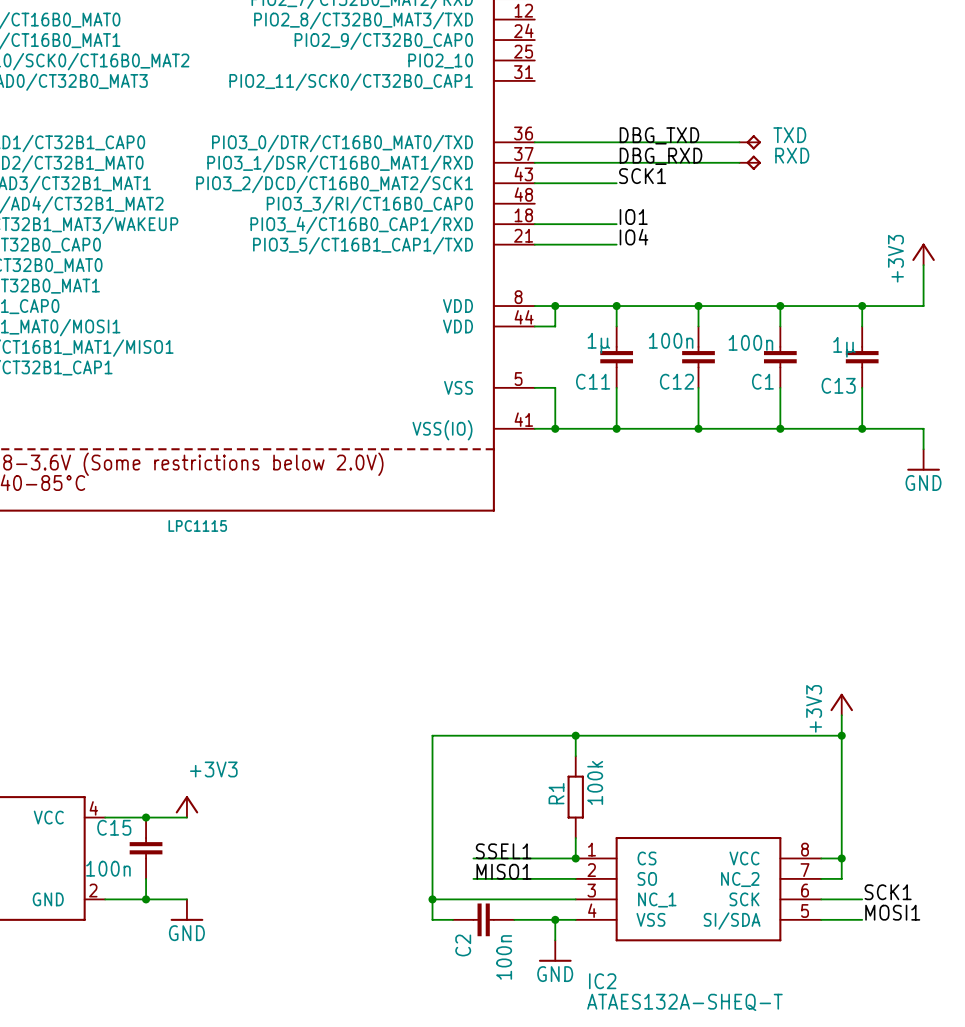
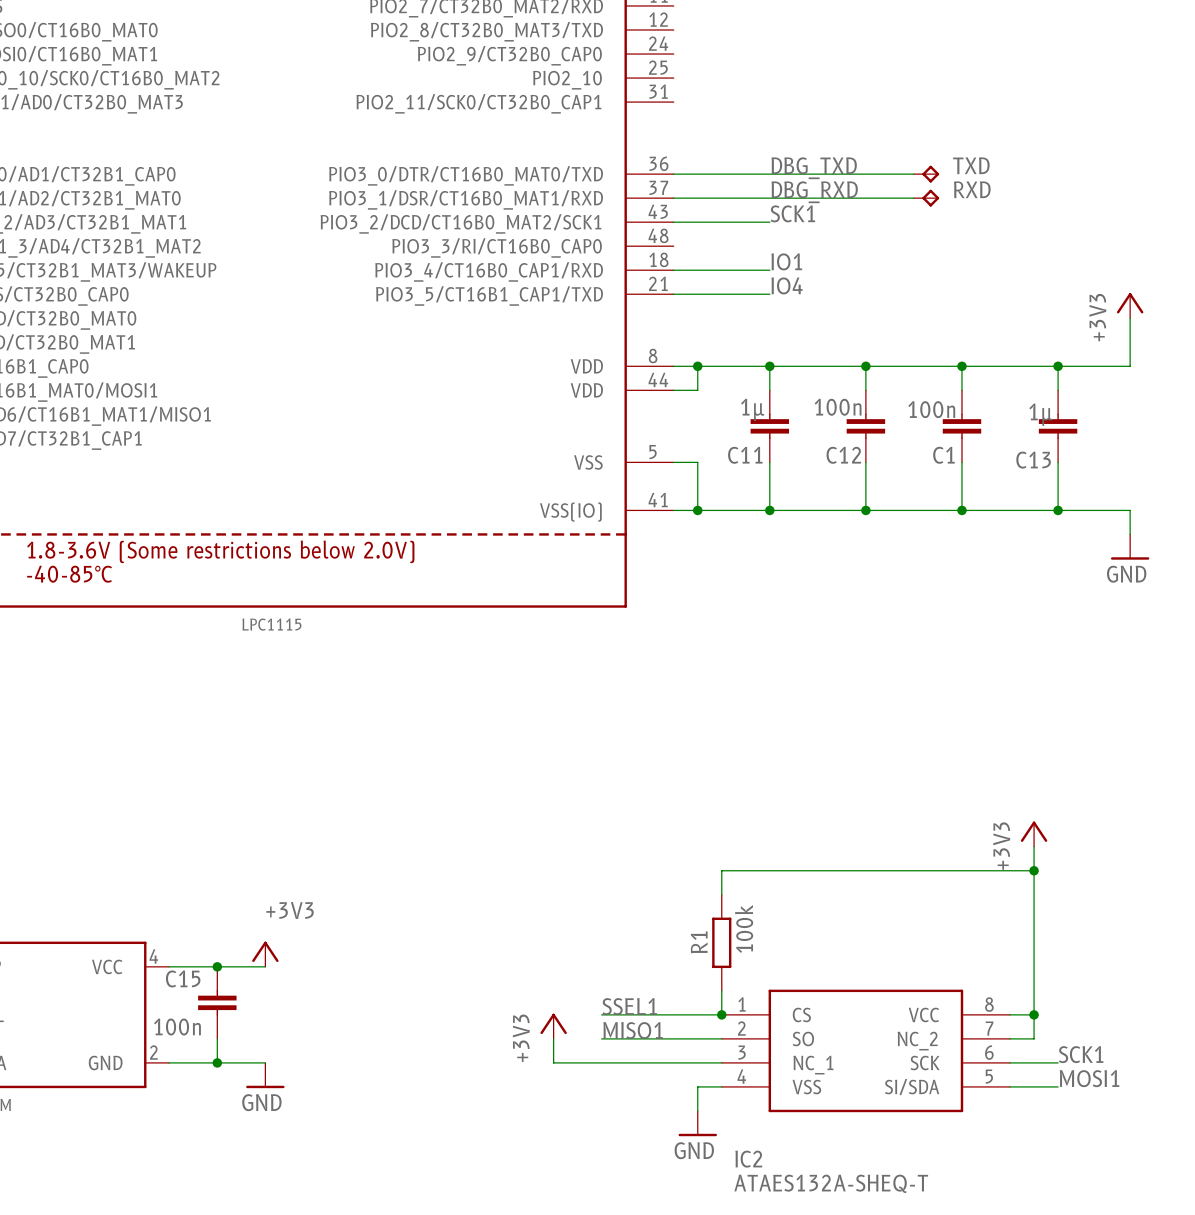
wire: (575, 735) (432, 735) (432, 878) -> none
junction: (575, 735) -> none
power symbol: none -> +3V3 (553, 1026)
wire: (432, 899) (432, 919) (452, 919) -> none
junction: (432, 899) -> none
C2: 100n (483, 919) -> none
wire: (514, 919) (555, 919) -> none
junction: (555, 919) -> none

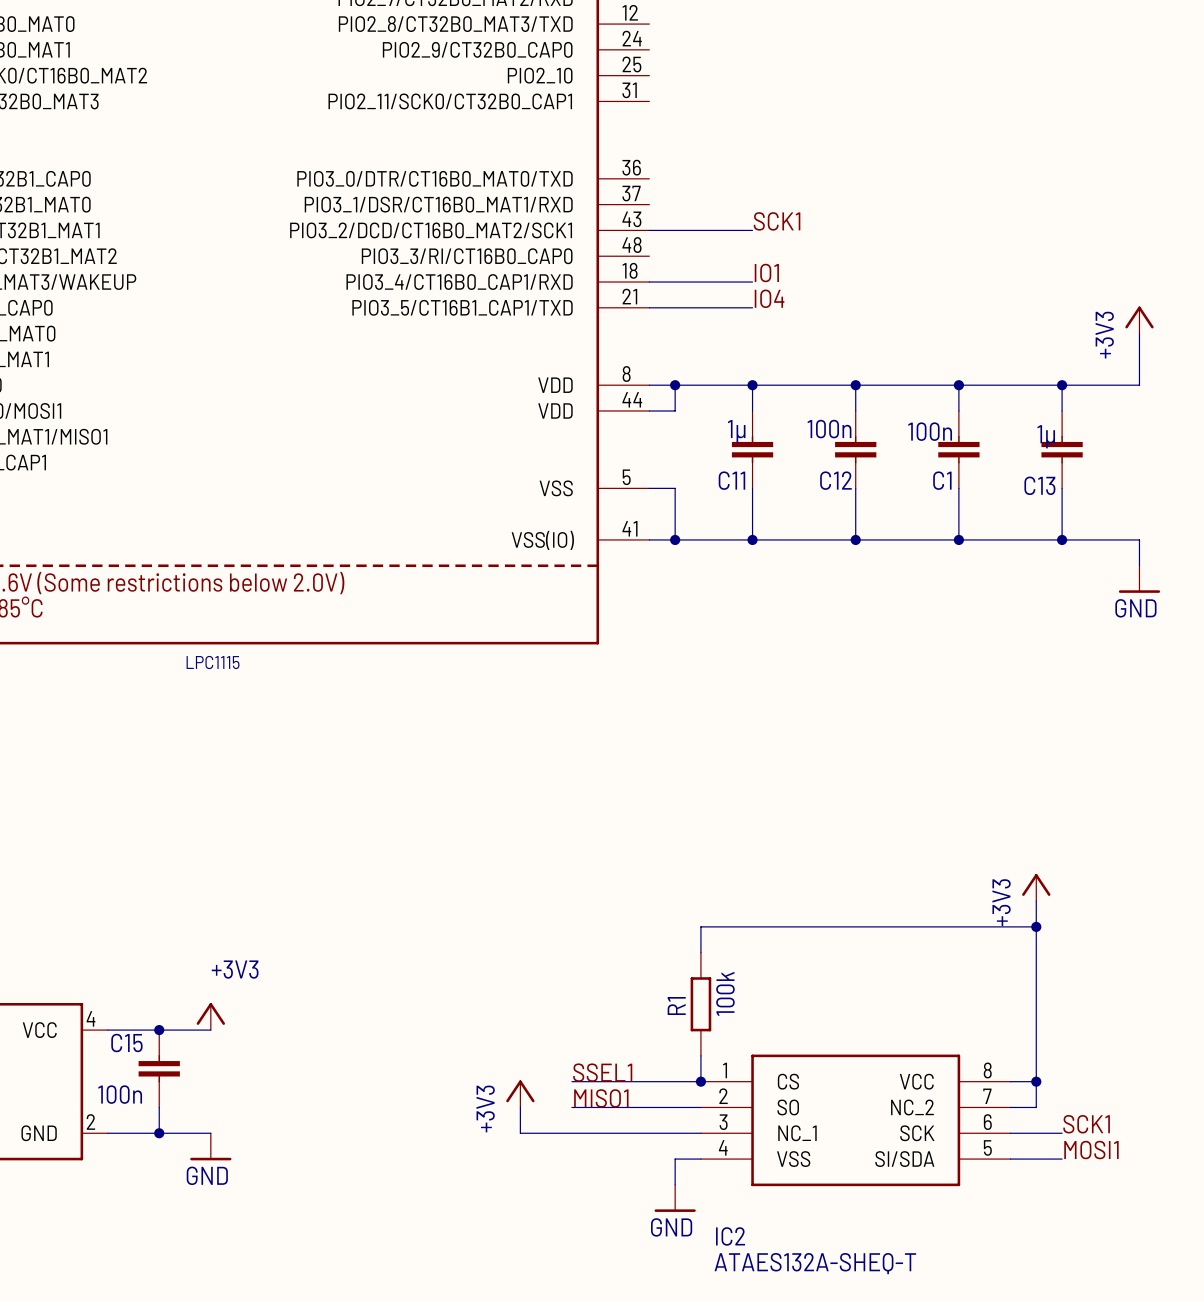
label: DBG_TXD (814, 168) -> none
wire: (673, 174) (913, 174) -> none
TXD: (926, 174) -> none
label: DBG_RXD (814, 192) -> none
wire: (673, 198) (913, 198) -> none
RXD: (926, 198) -> none

